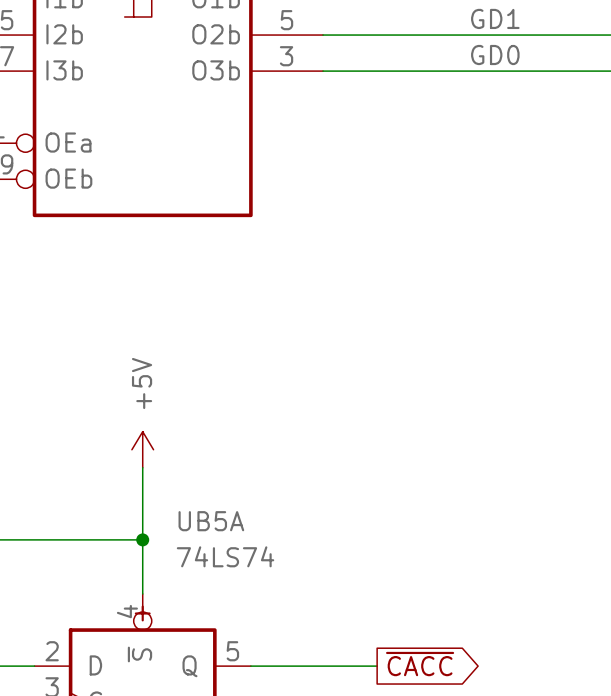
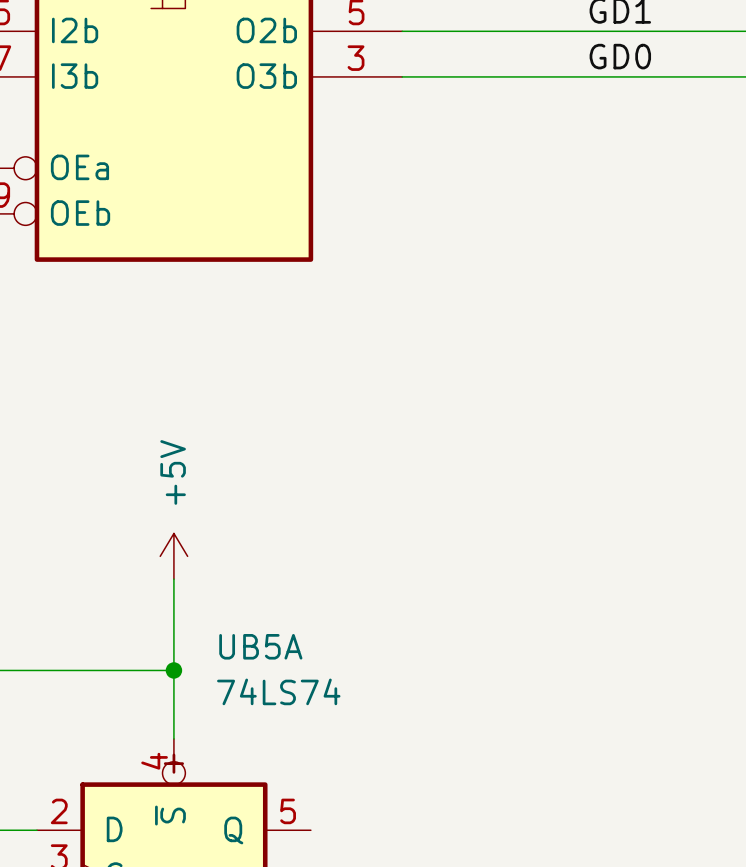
global label: ~{CACC} (420, 664) -> none
wire: (250, 666) (377, 666) -> none

